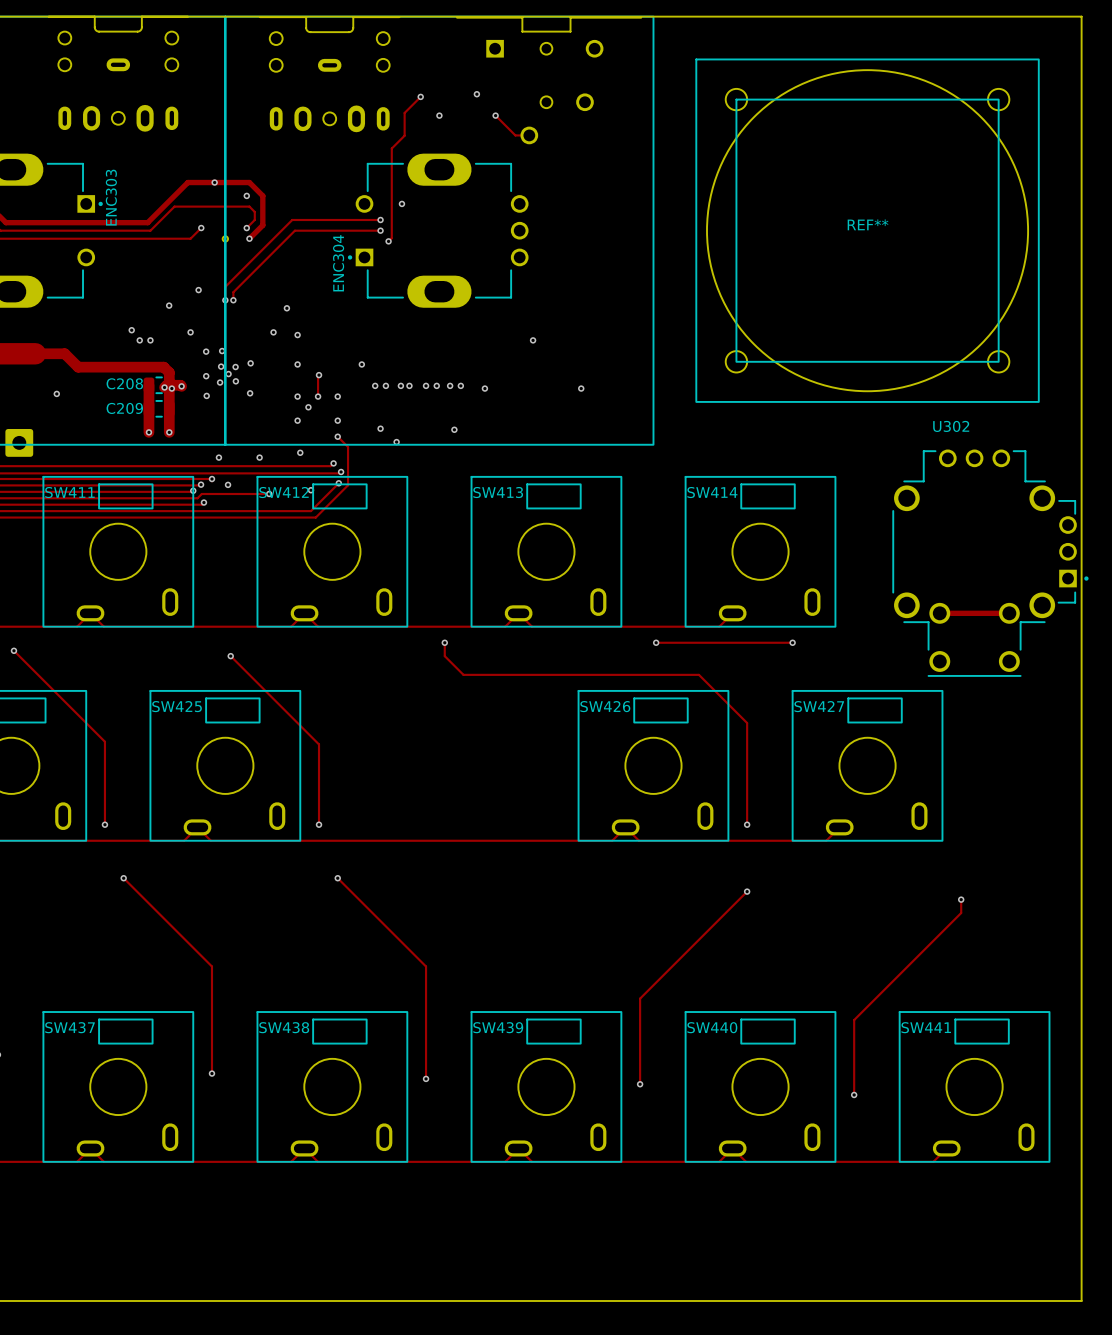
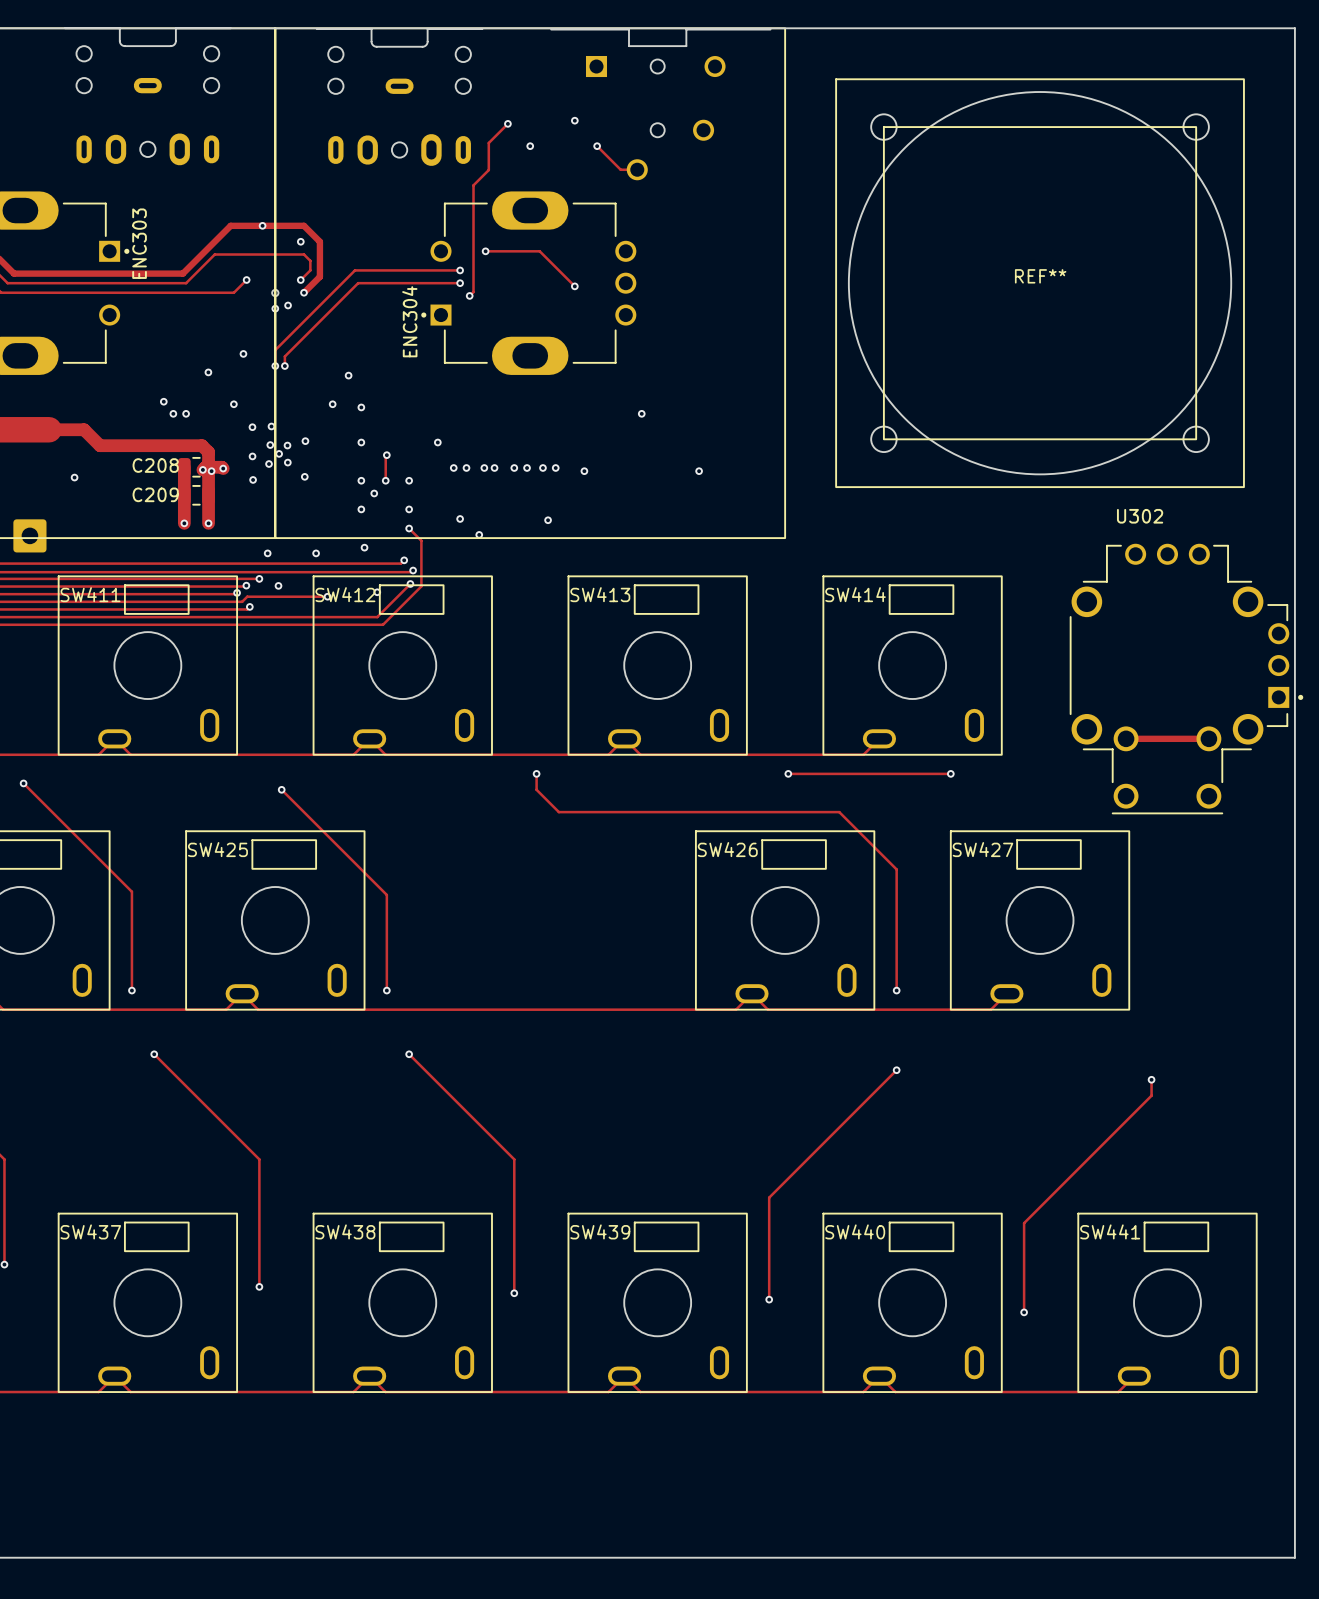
track: none -> (485, 251) (539, 251) (574, 286)
via: none -> (574, 286)
via: none -> (288, 305)
via: none -> (275, 308)

